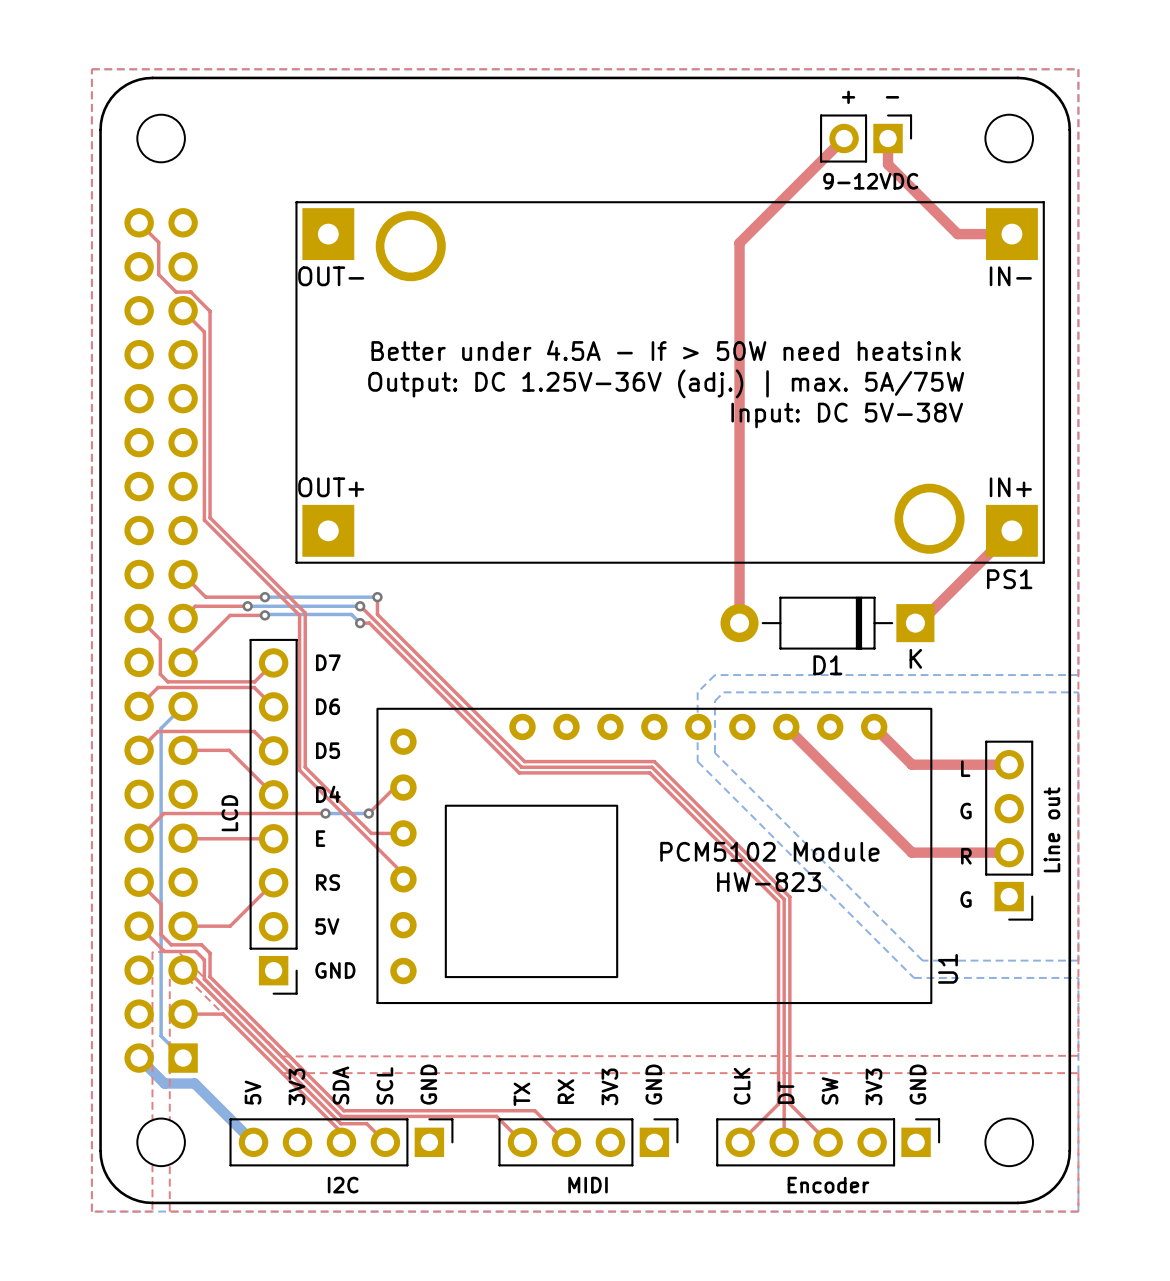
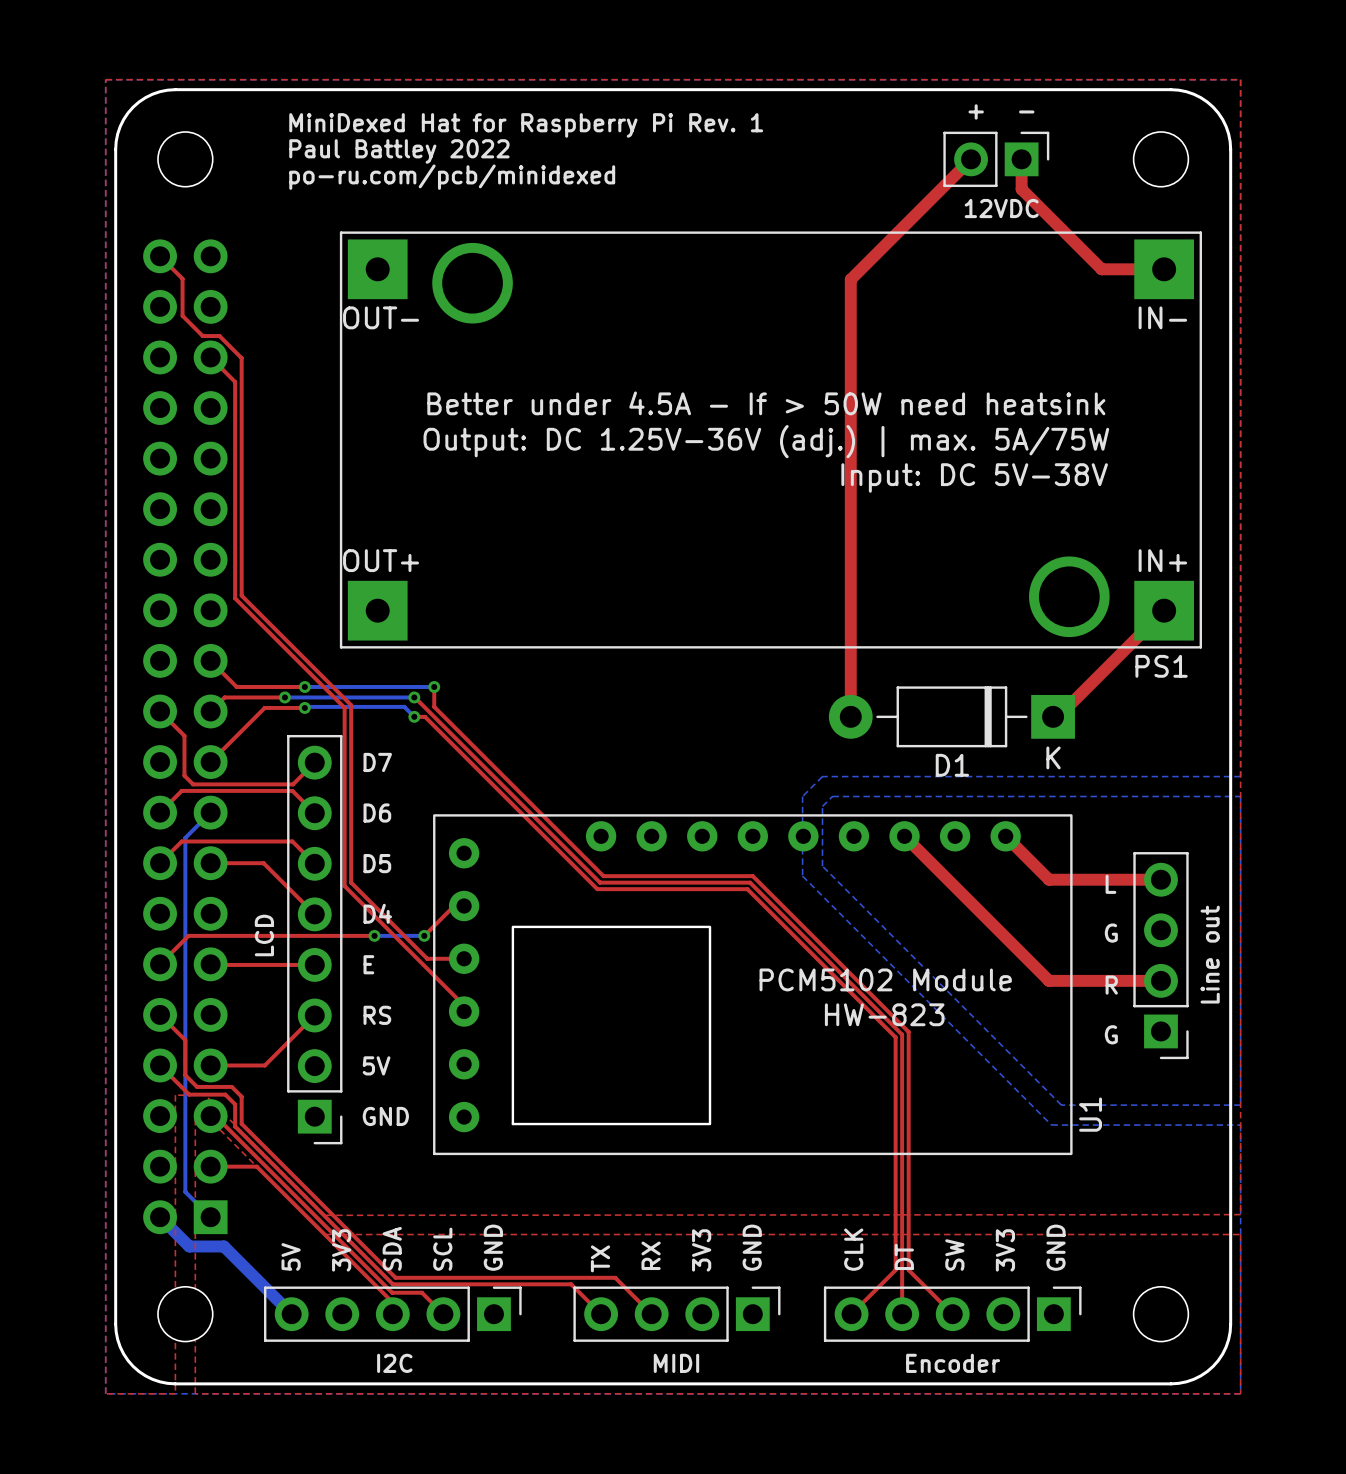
text: none -> MiniDexed Hat for Raspberry Pi Rev. 1 (526, 125)
text: none -> Paul Battley 2022 (399, 151)
text: none -> po-ru.com/pcb/minidexed (452, 177)
text: 9-12VDC (870, 181) -> 12VDC (1001, 208)

